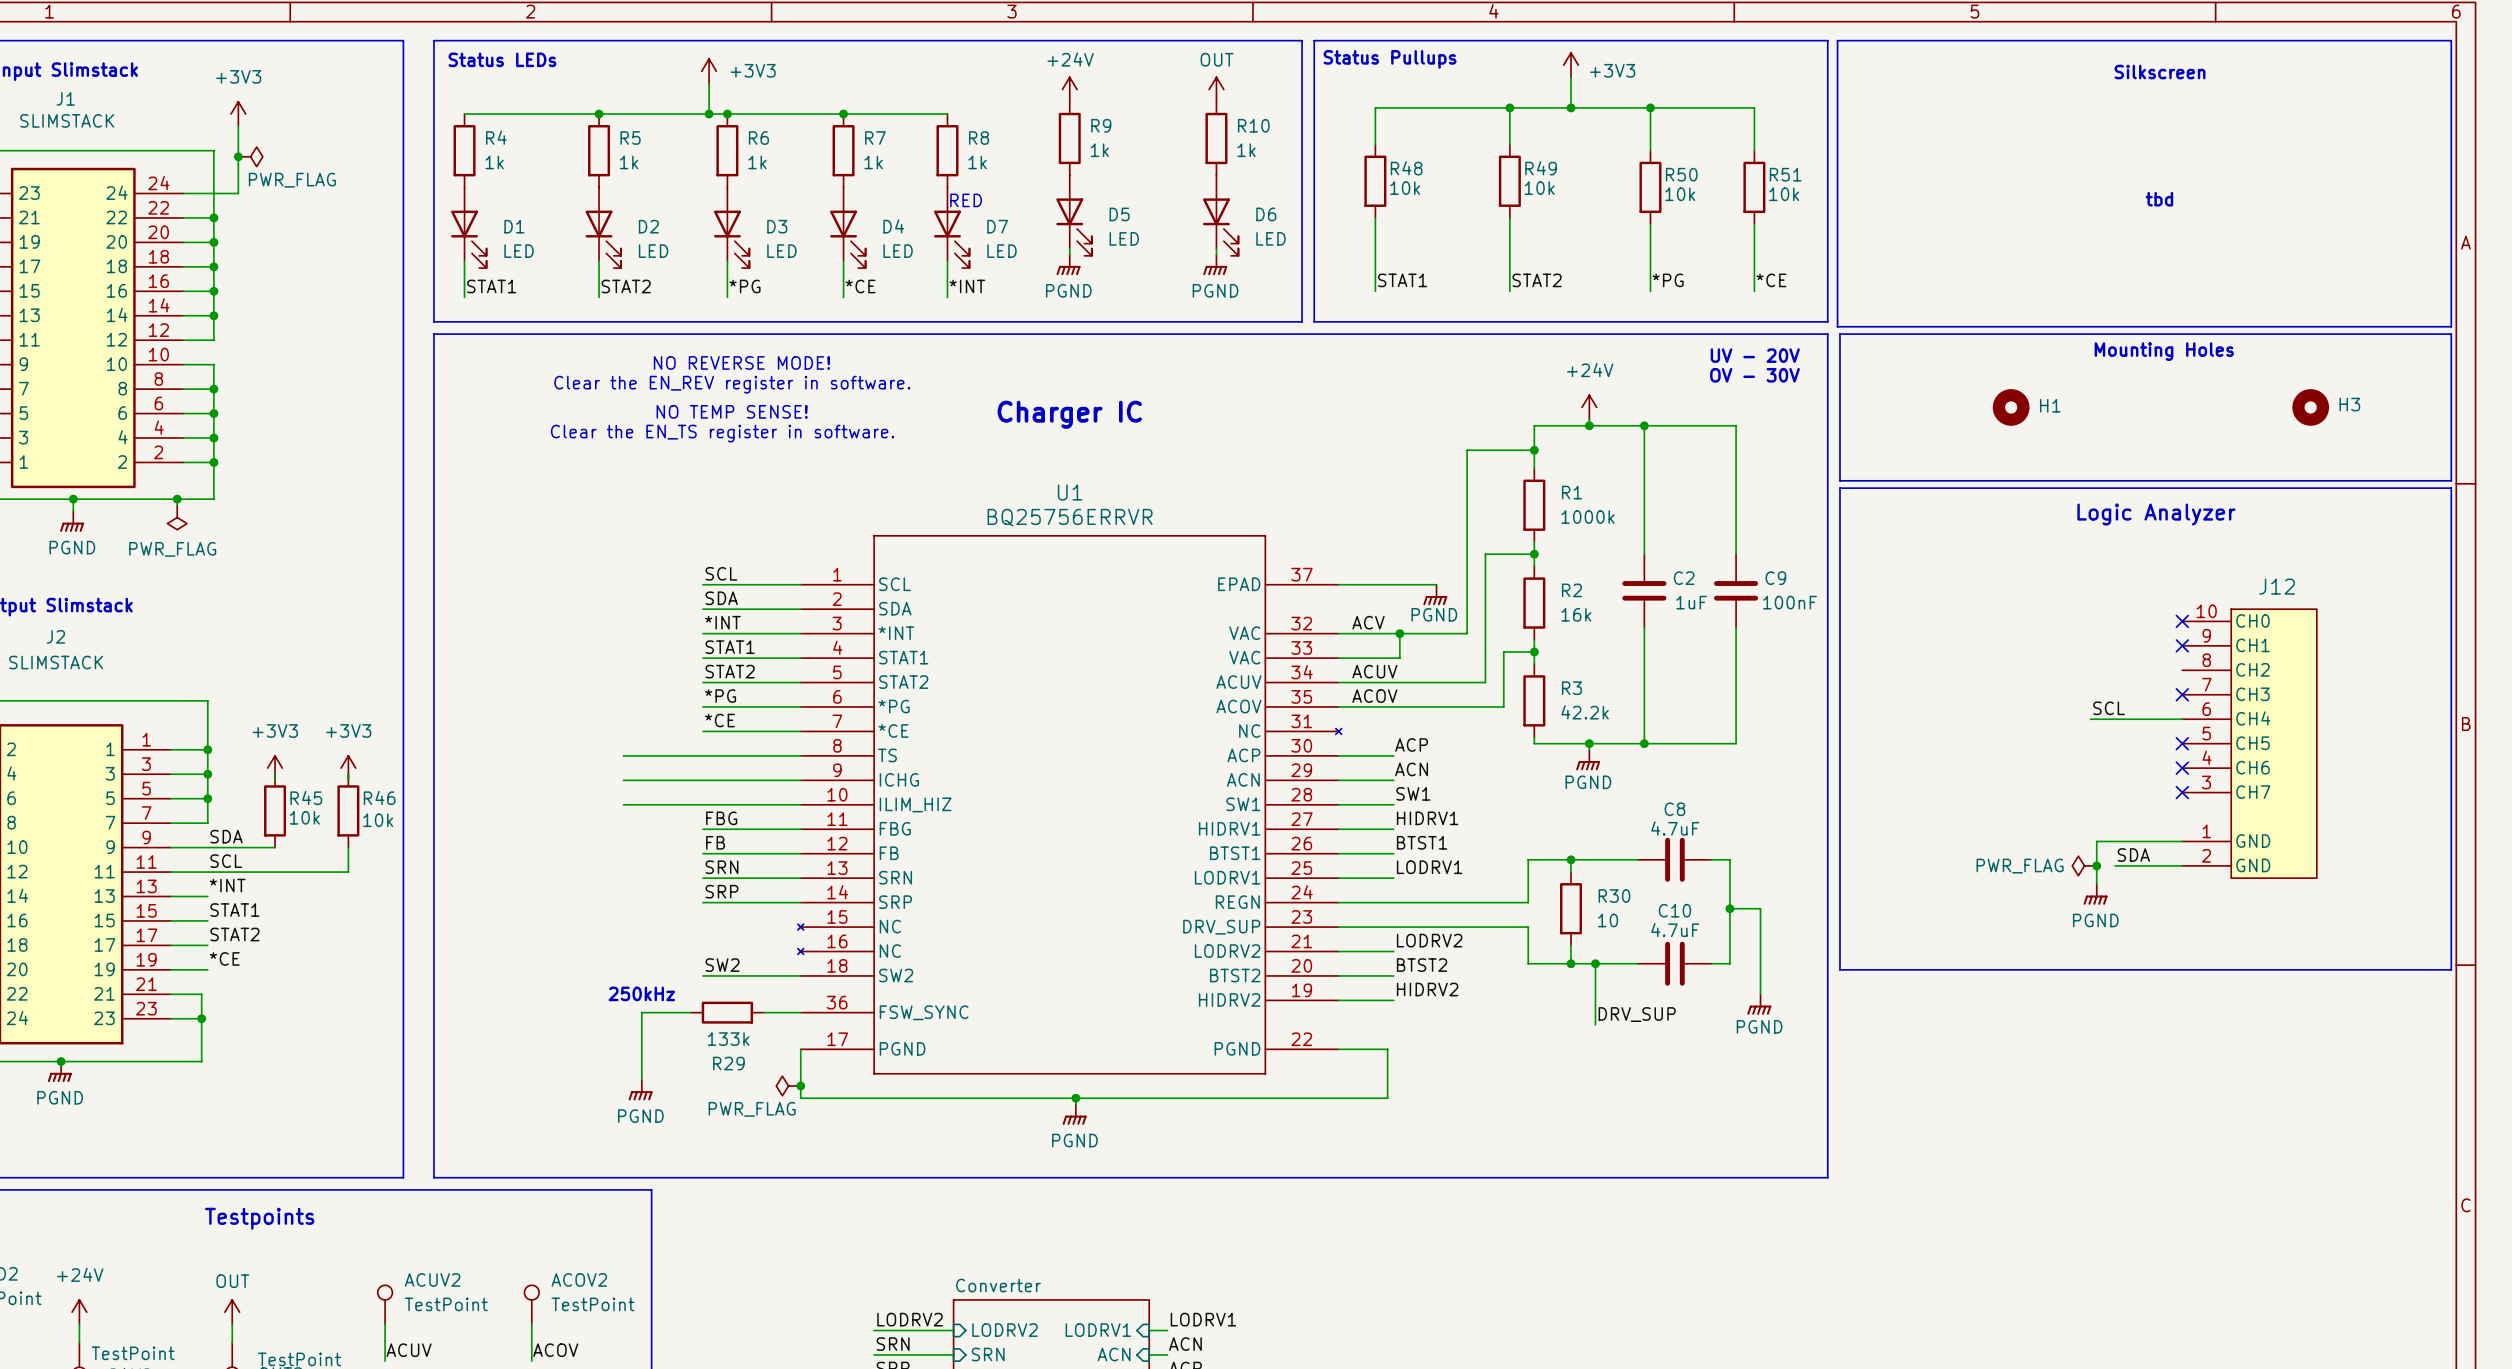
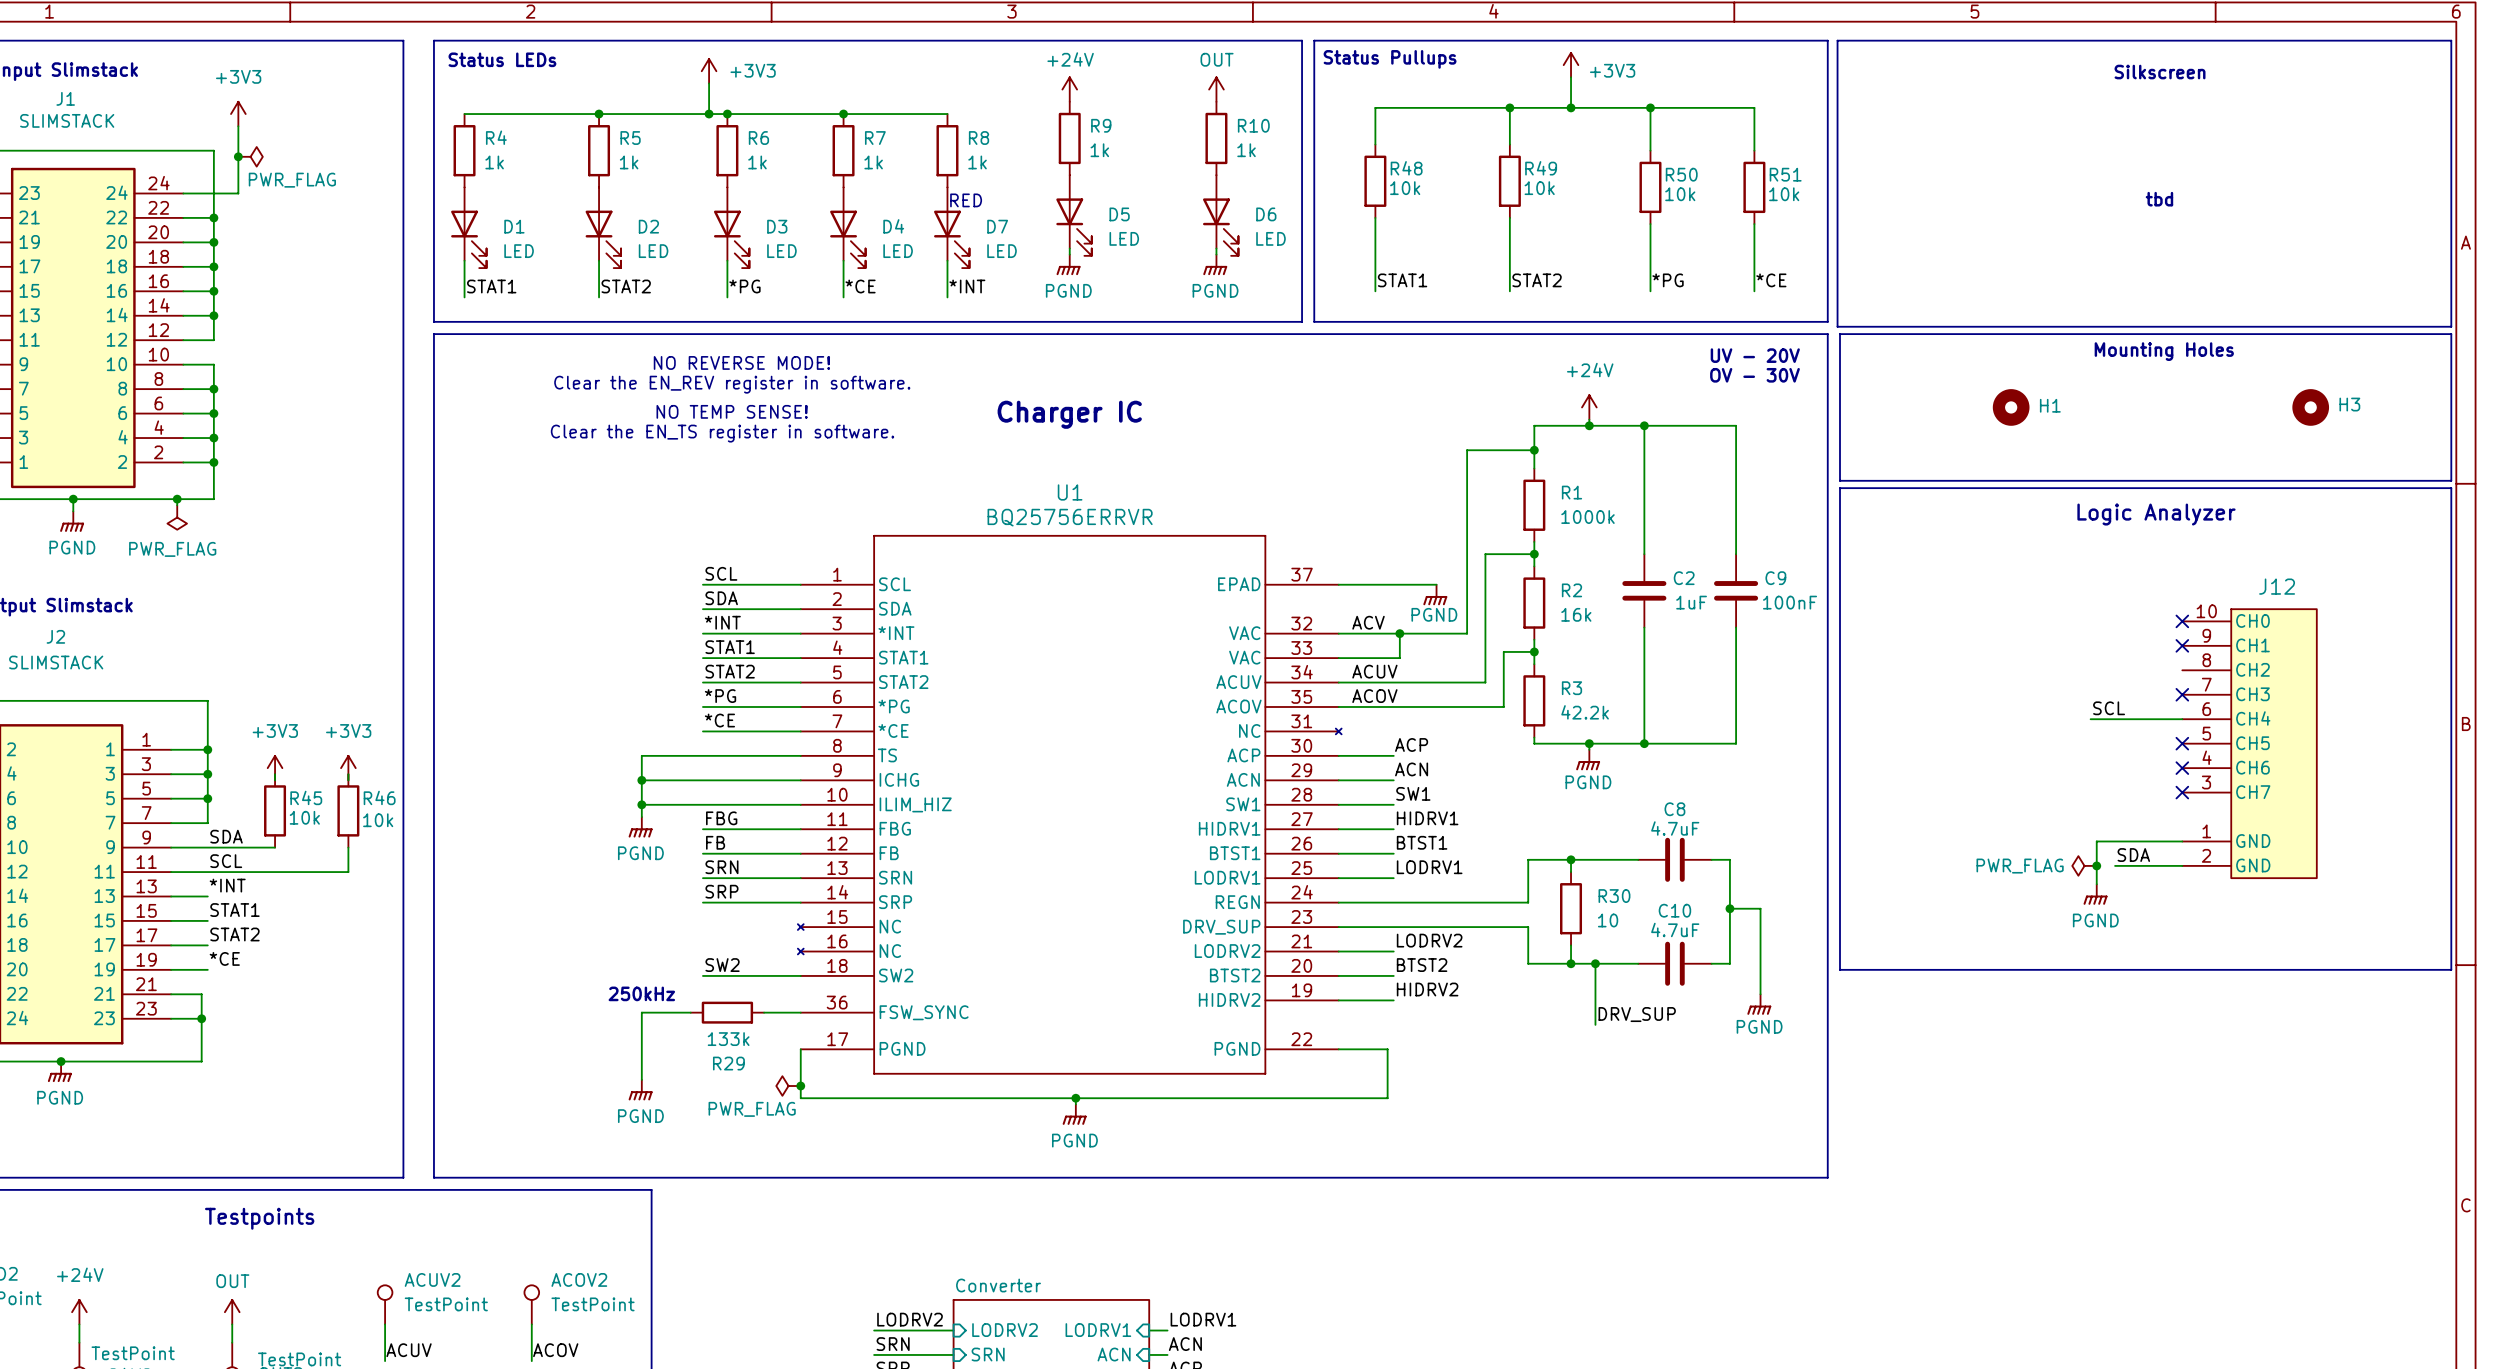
wire: (623, 755) (641, 755) -> (641, 817) (641, 755)
wire: (623, 780) (641, 780) -> none
junction: none -> (641, 780)
wire: (623, 804) (641, 804) -> none
junction: none -> (641, 804)
power symbol: none -> PGND (640, 827)

